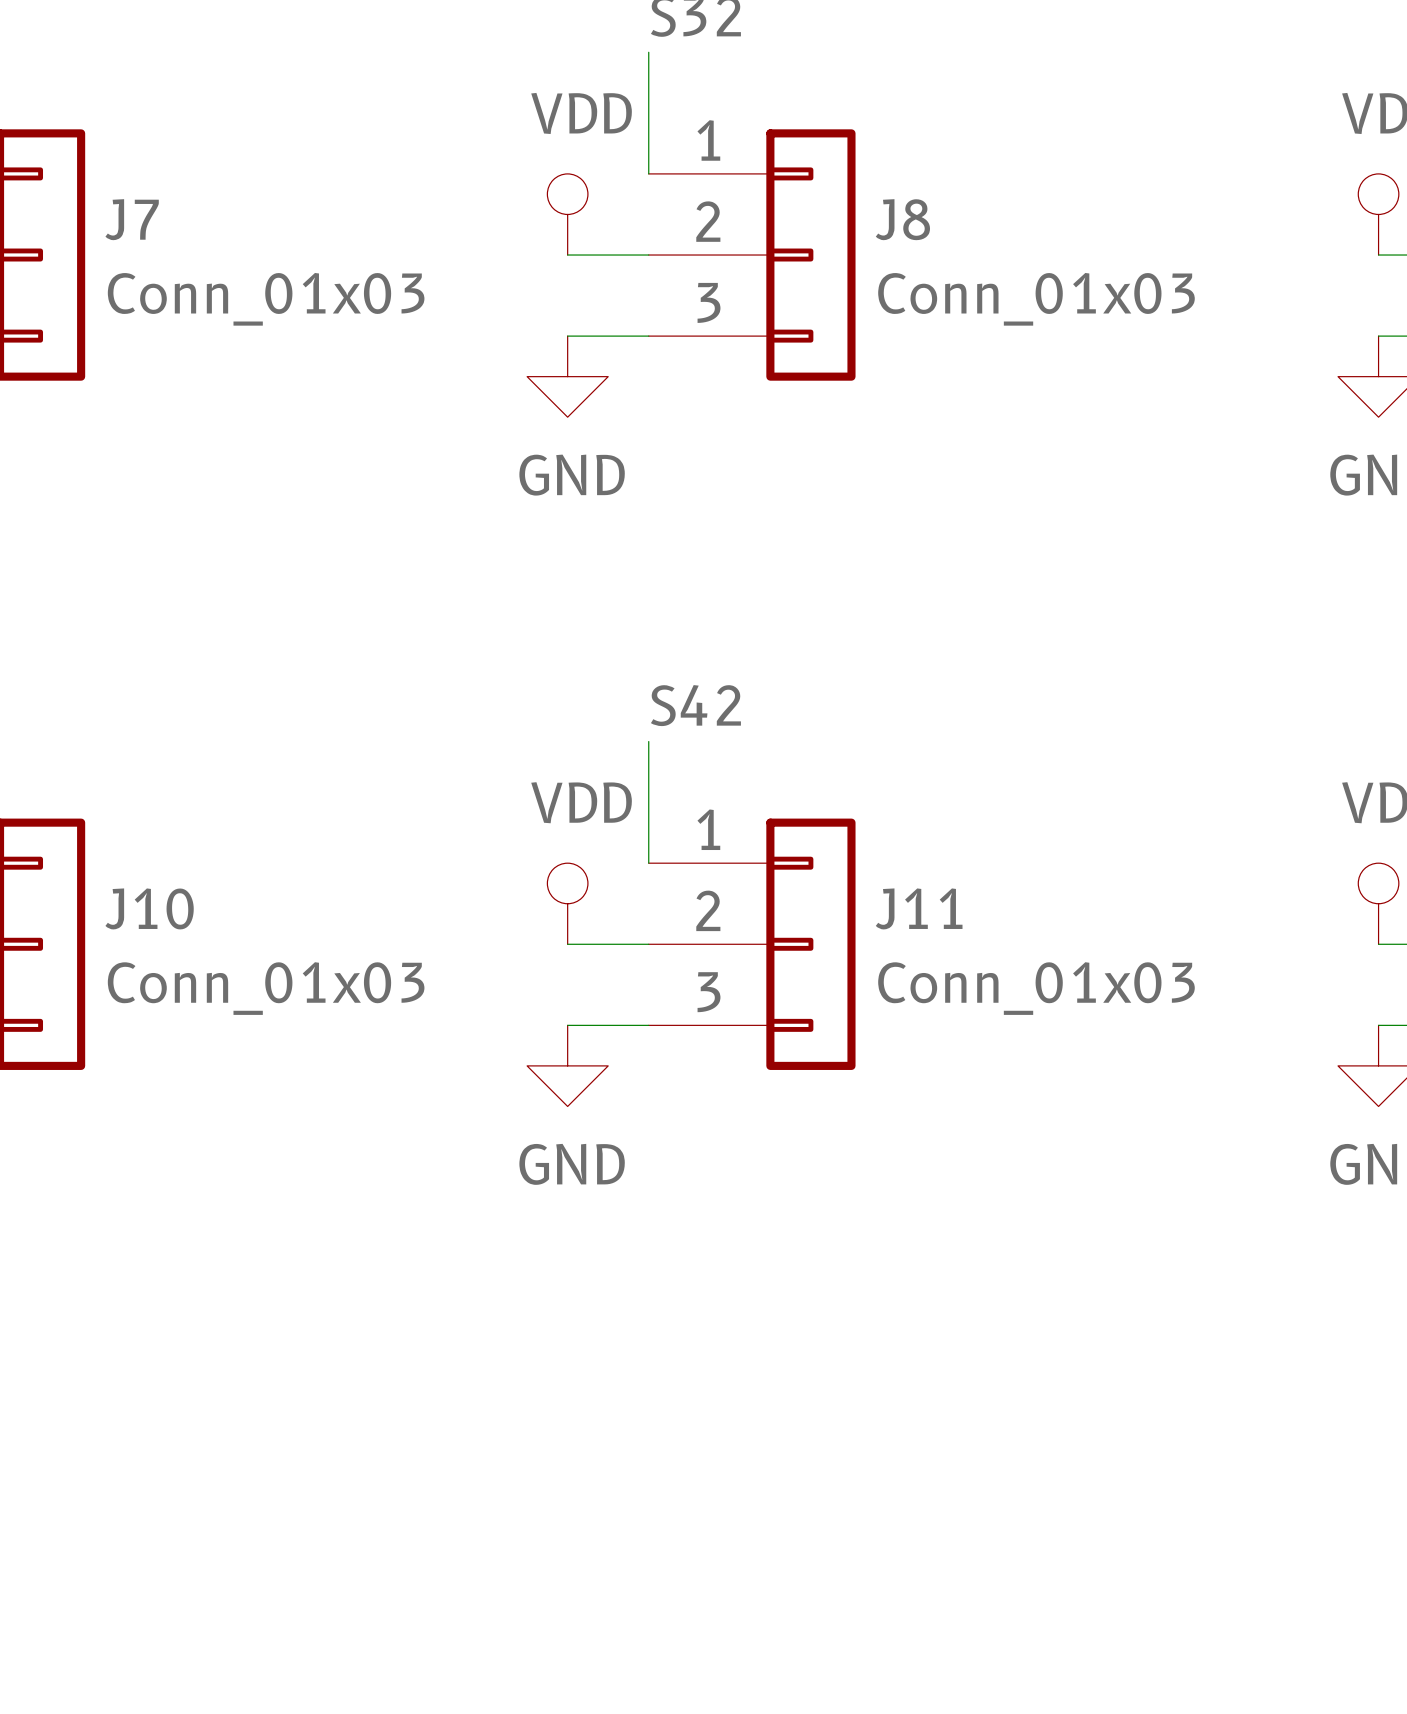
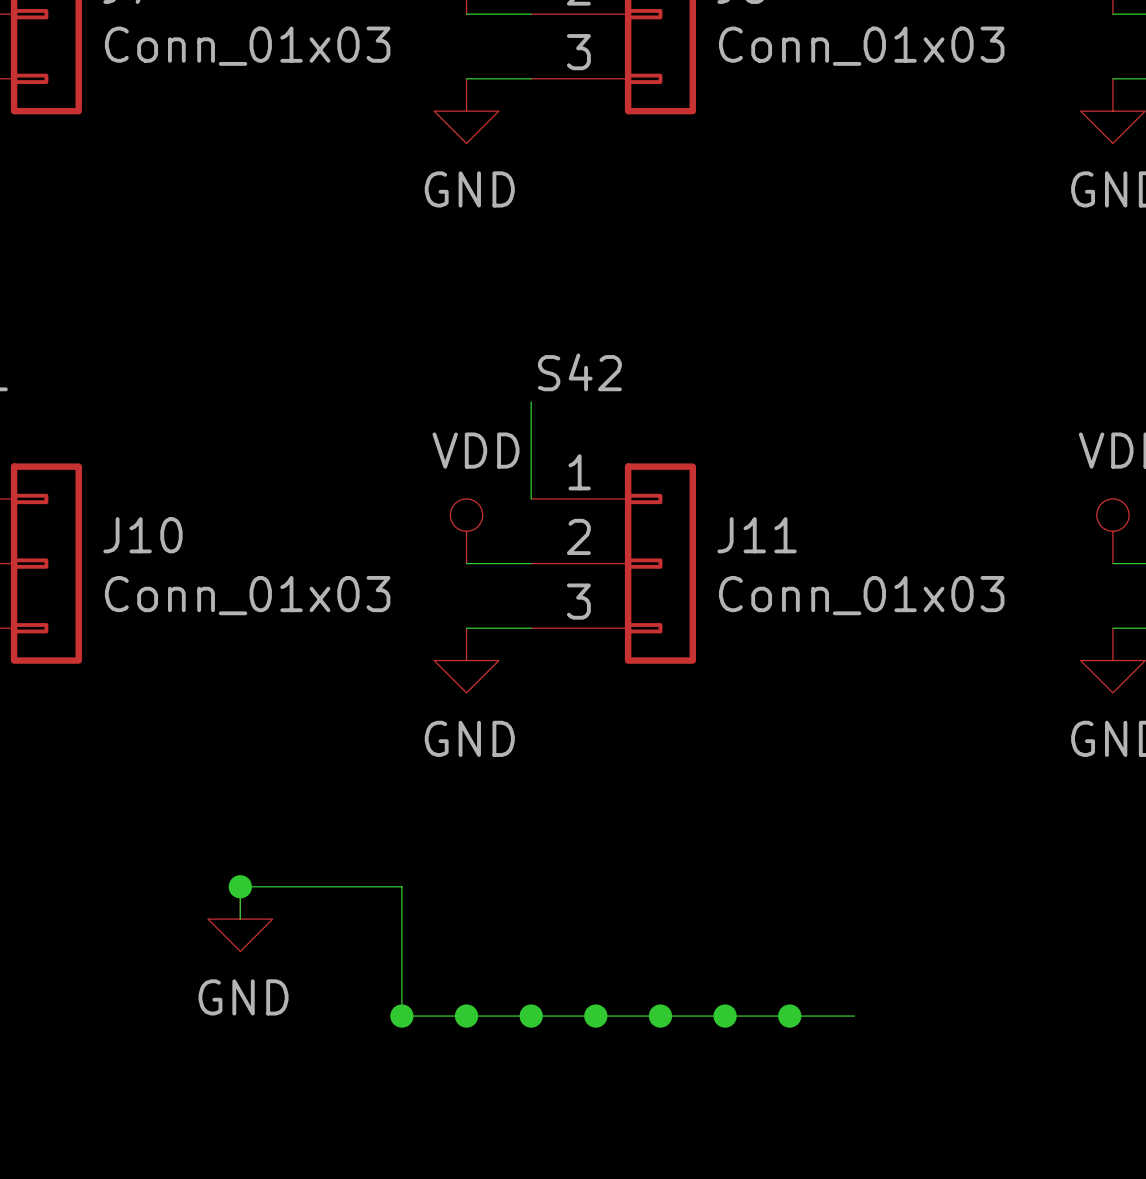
junction: none -> (240, 886)
wire: none -> (240, 919) (240, 886) (401, 886) (401, 1016) (854, 1016)
power symbol: none -> GND (240, 919)
junction: none -> (401, 1016)
junction: none -> (466, 1016)
junction: none -> (531, 1016)
junction: none -> (595, 1016)
junction: none -> (660, 1016)
junction: none -> (725, 1016)
junction: none -> (789, 1016)

